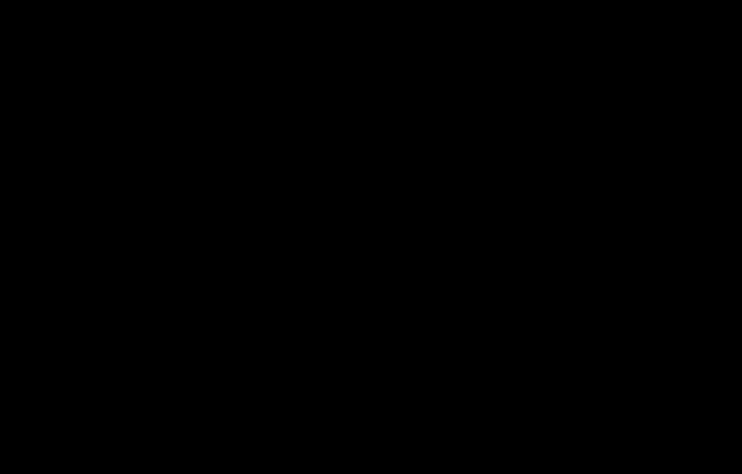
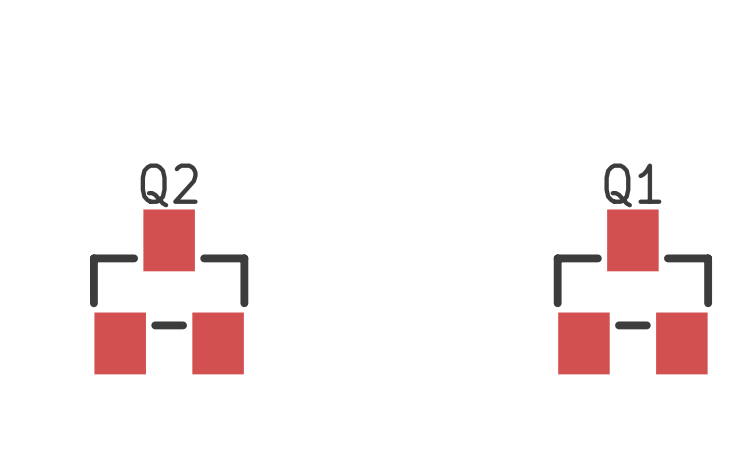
Q2: none -> (169, 291)
Q1: none -> (632, 291)

